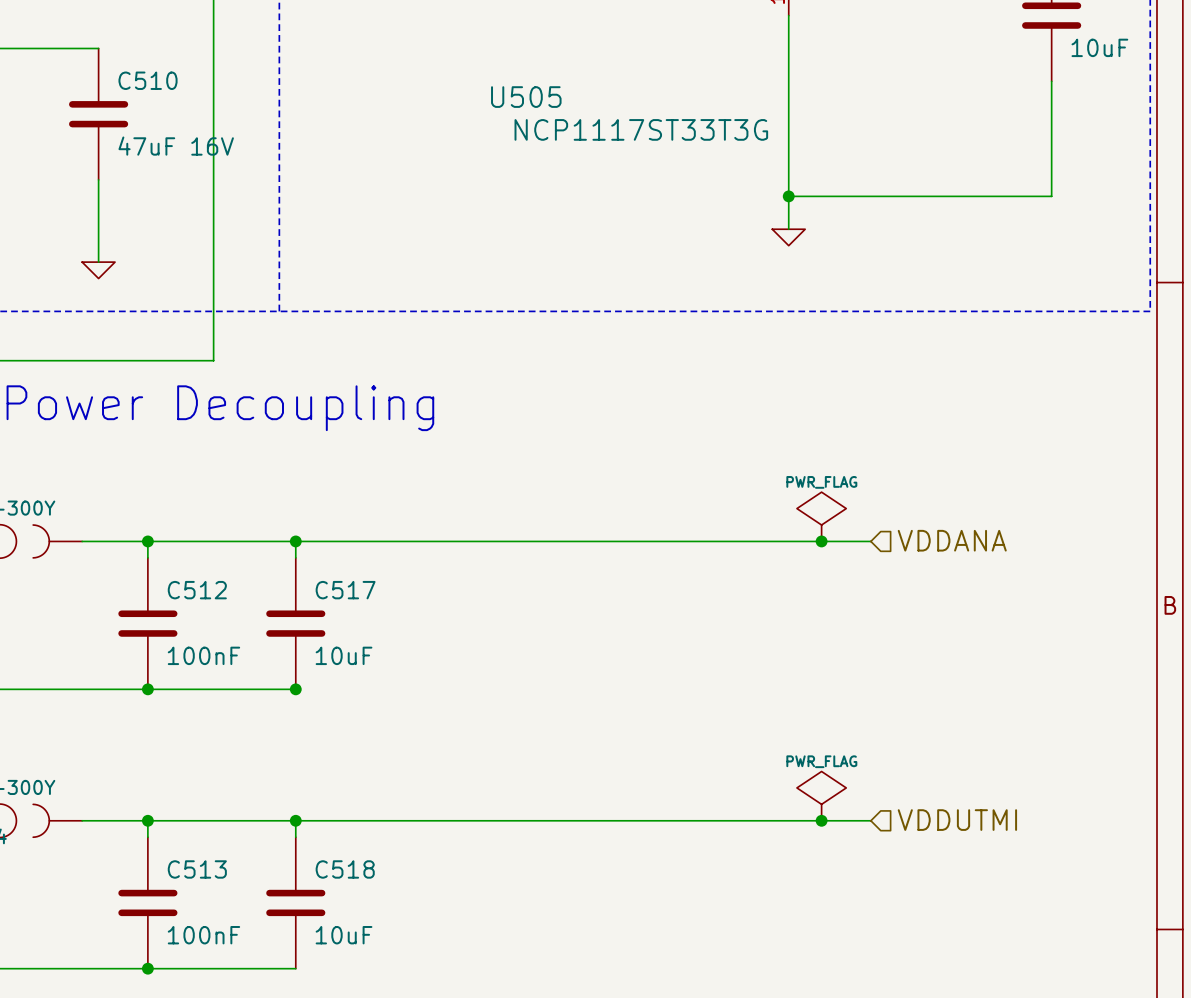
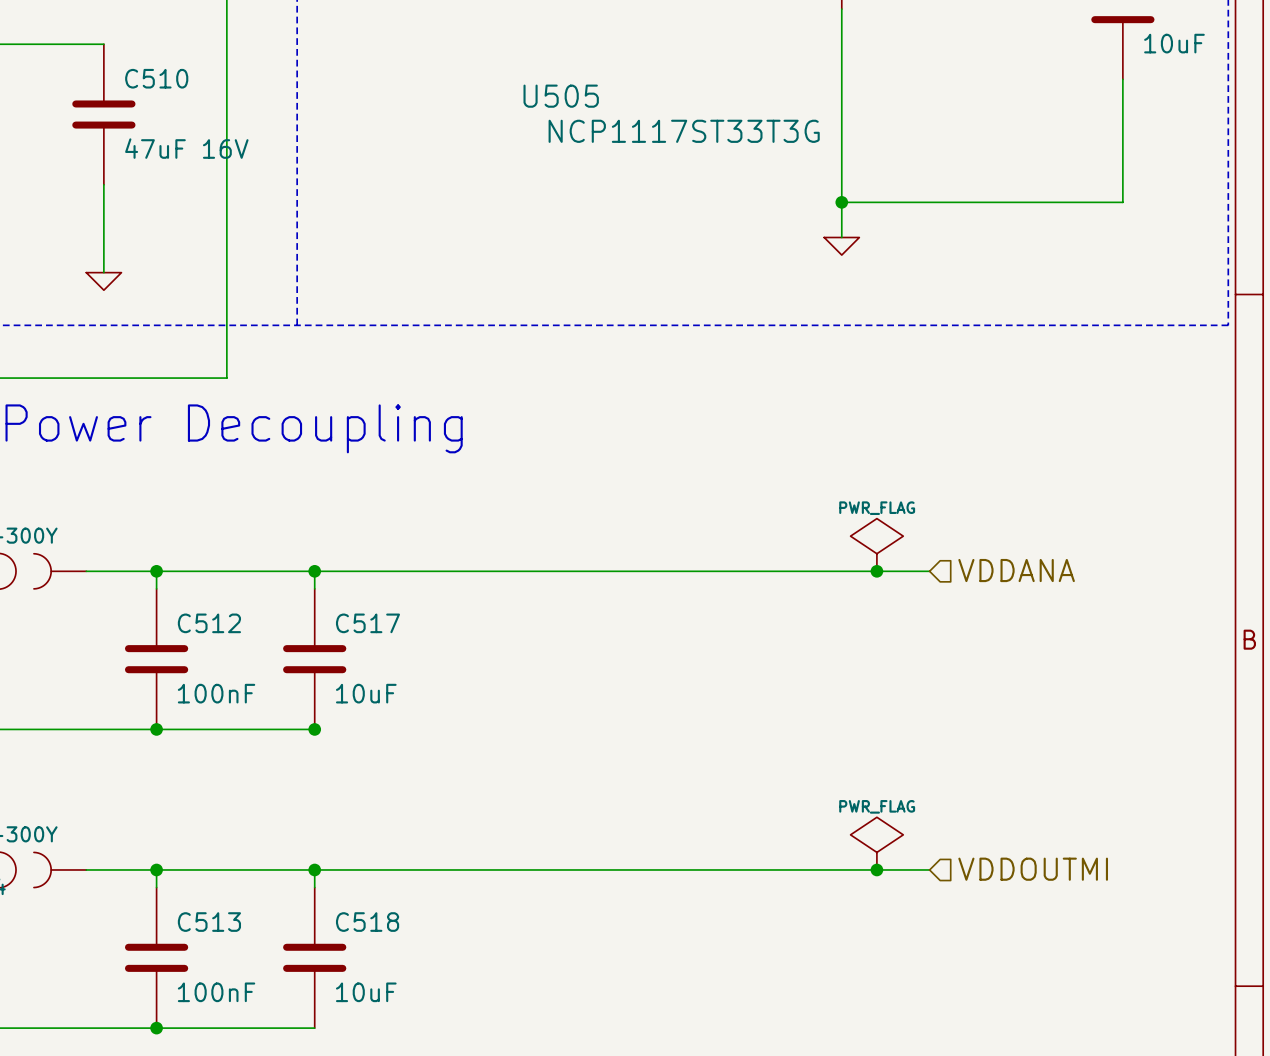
hierarchical label: VDDUTMI (957, 820) -> VDDOUTMI (1033, 869)

